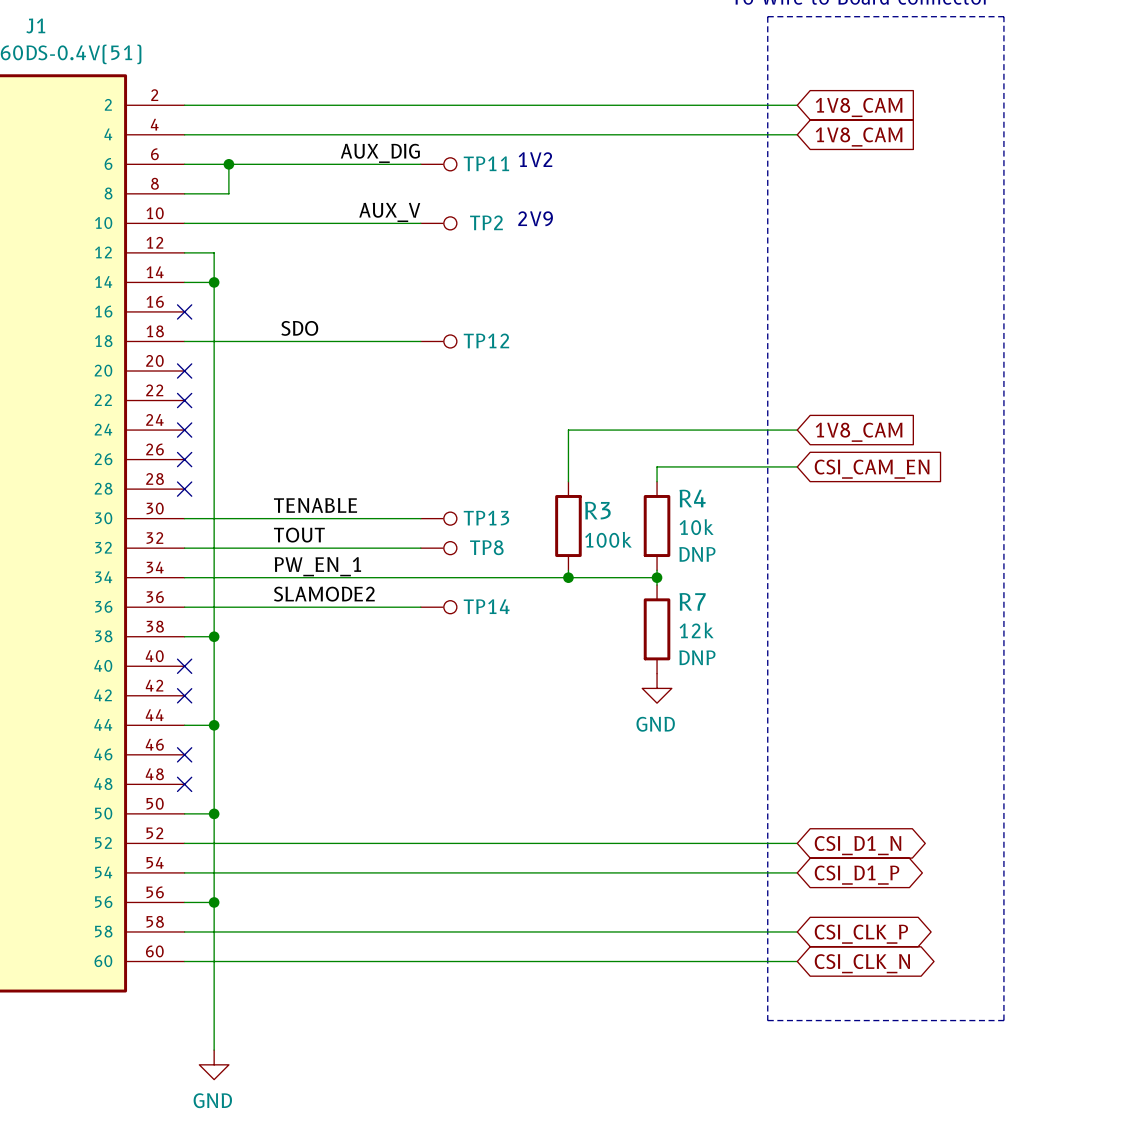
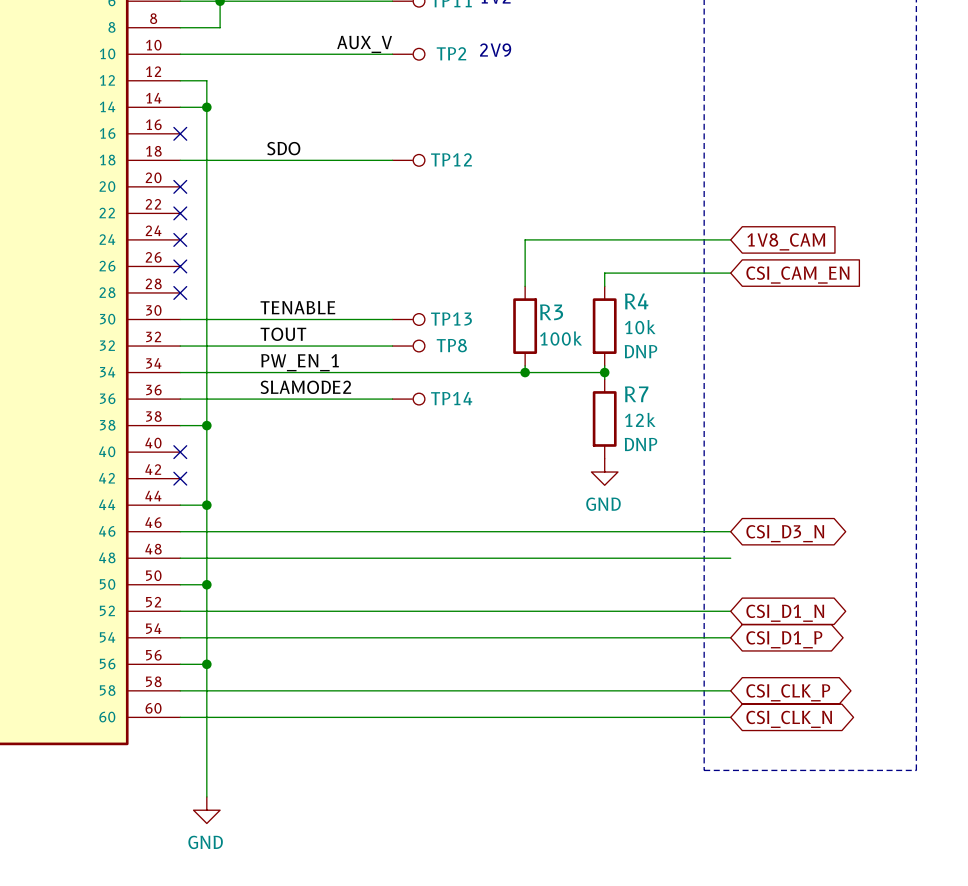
wire: none -> (180, 531) (730, 531)
no-connect mark: (184, 754) -> none
global label: none -> CSI_D3_N (785, 533)
wire: none -> (180, 558) (730, 558)
no-connect mark: (184, 784) -> none

